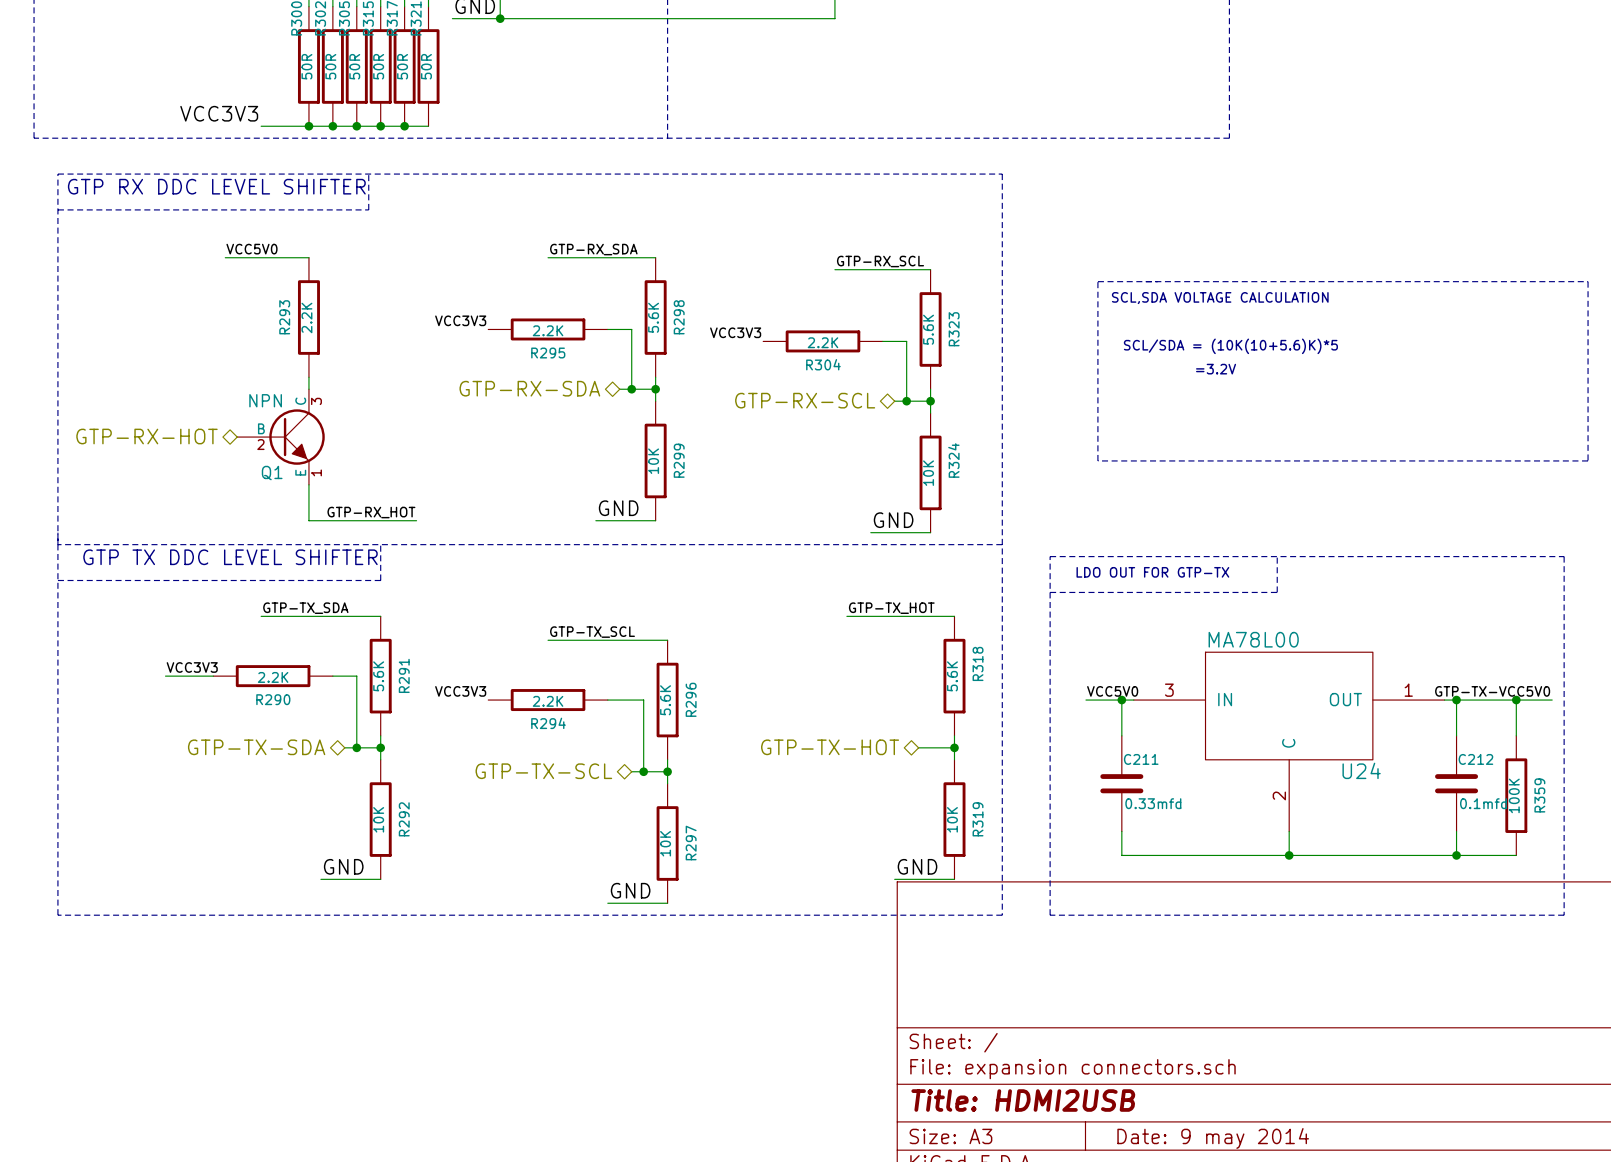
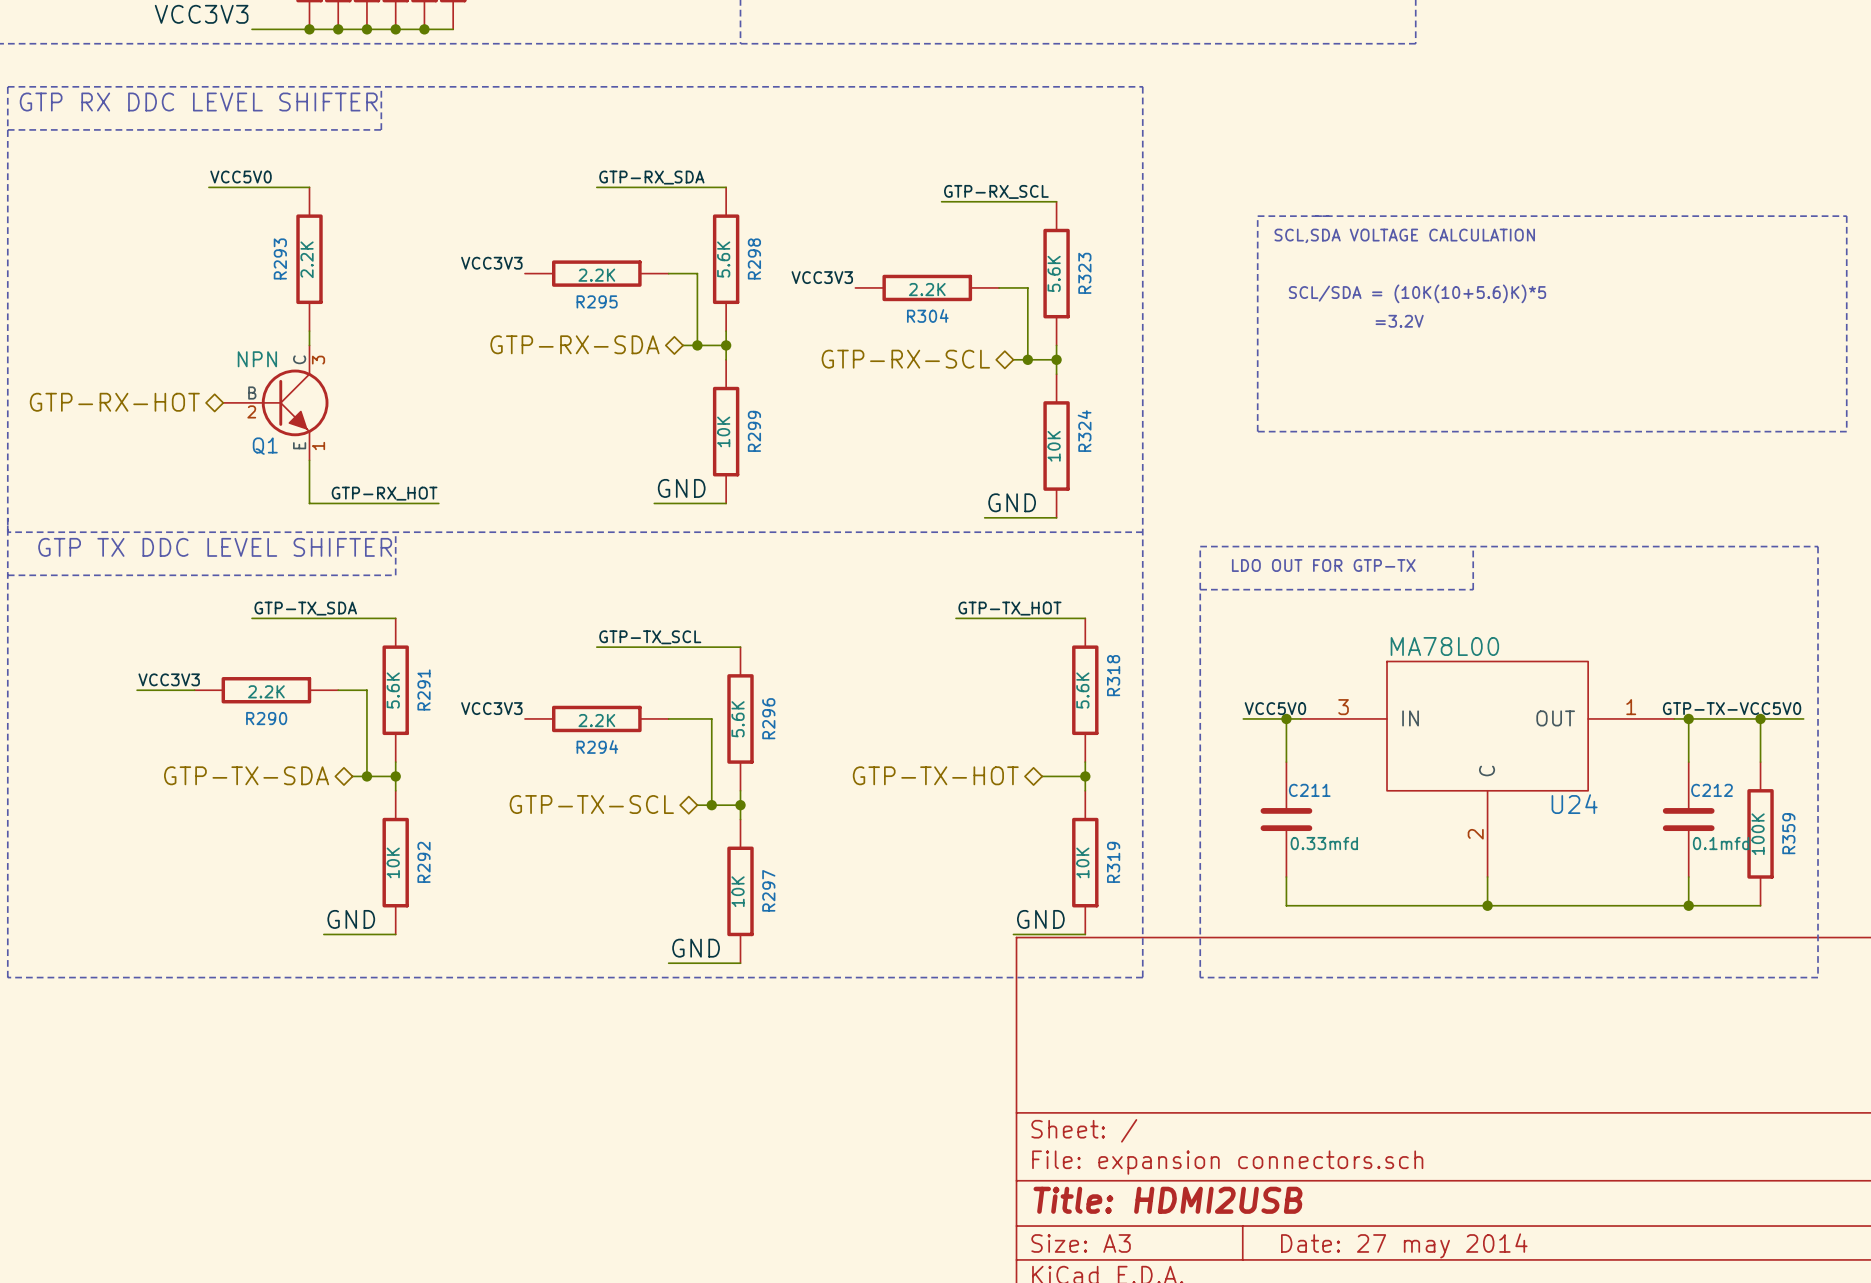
title block: Date: 9 may 2014 (1213, 1138) -> Date: 27 may 2014 (1404, 1245)

